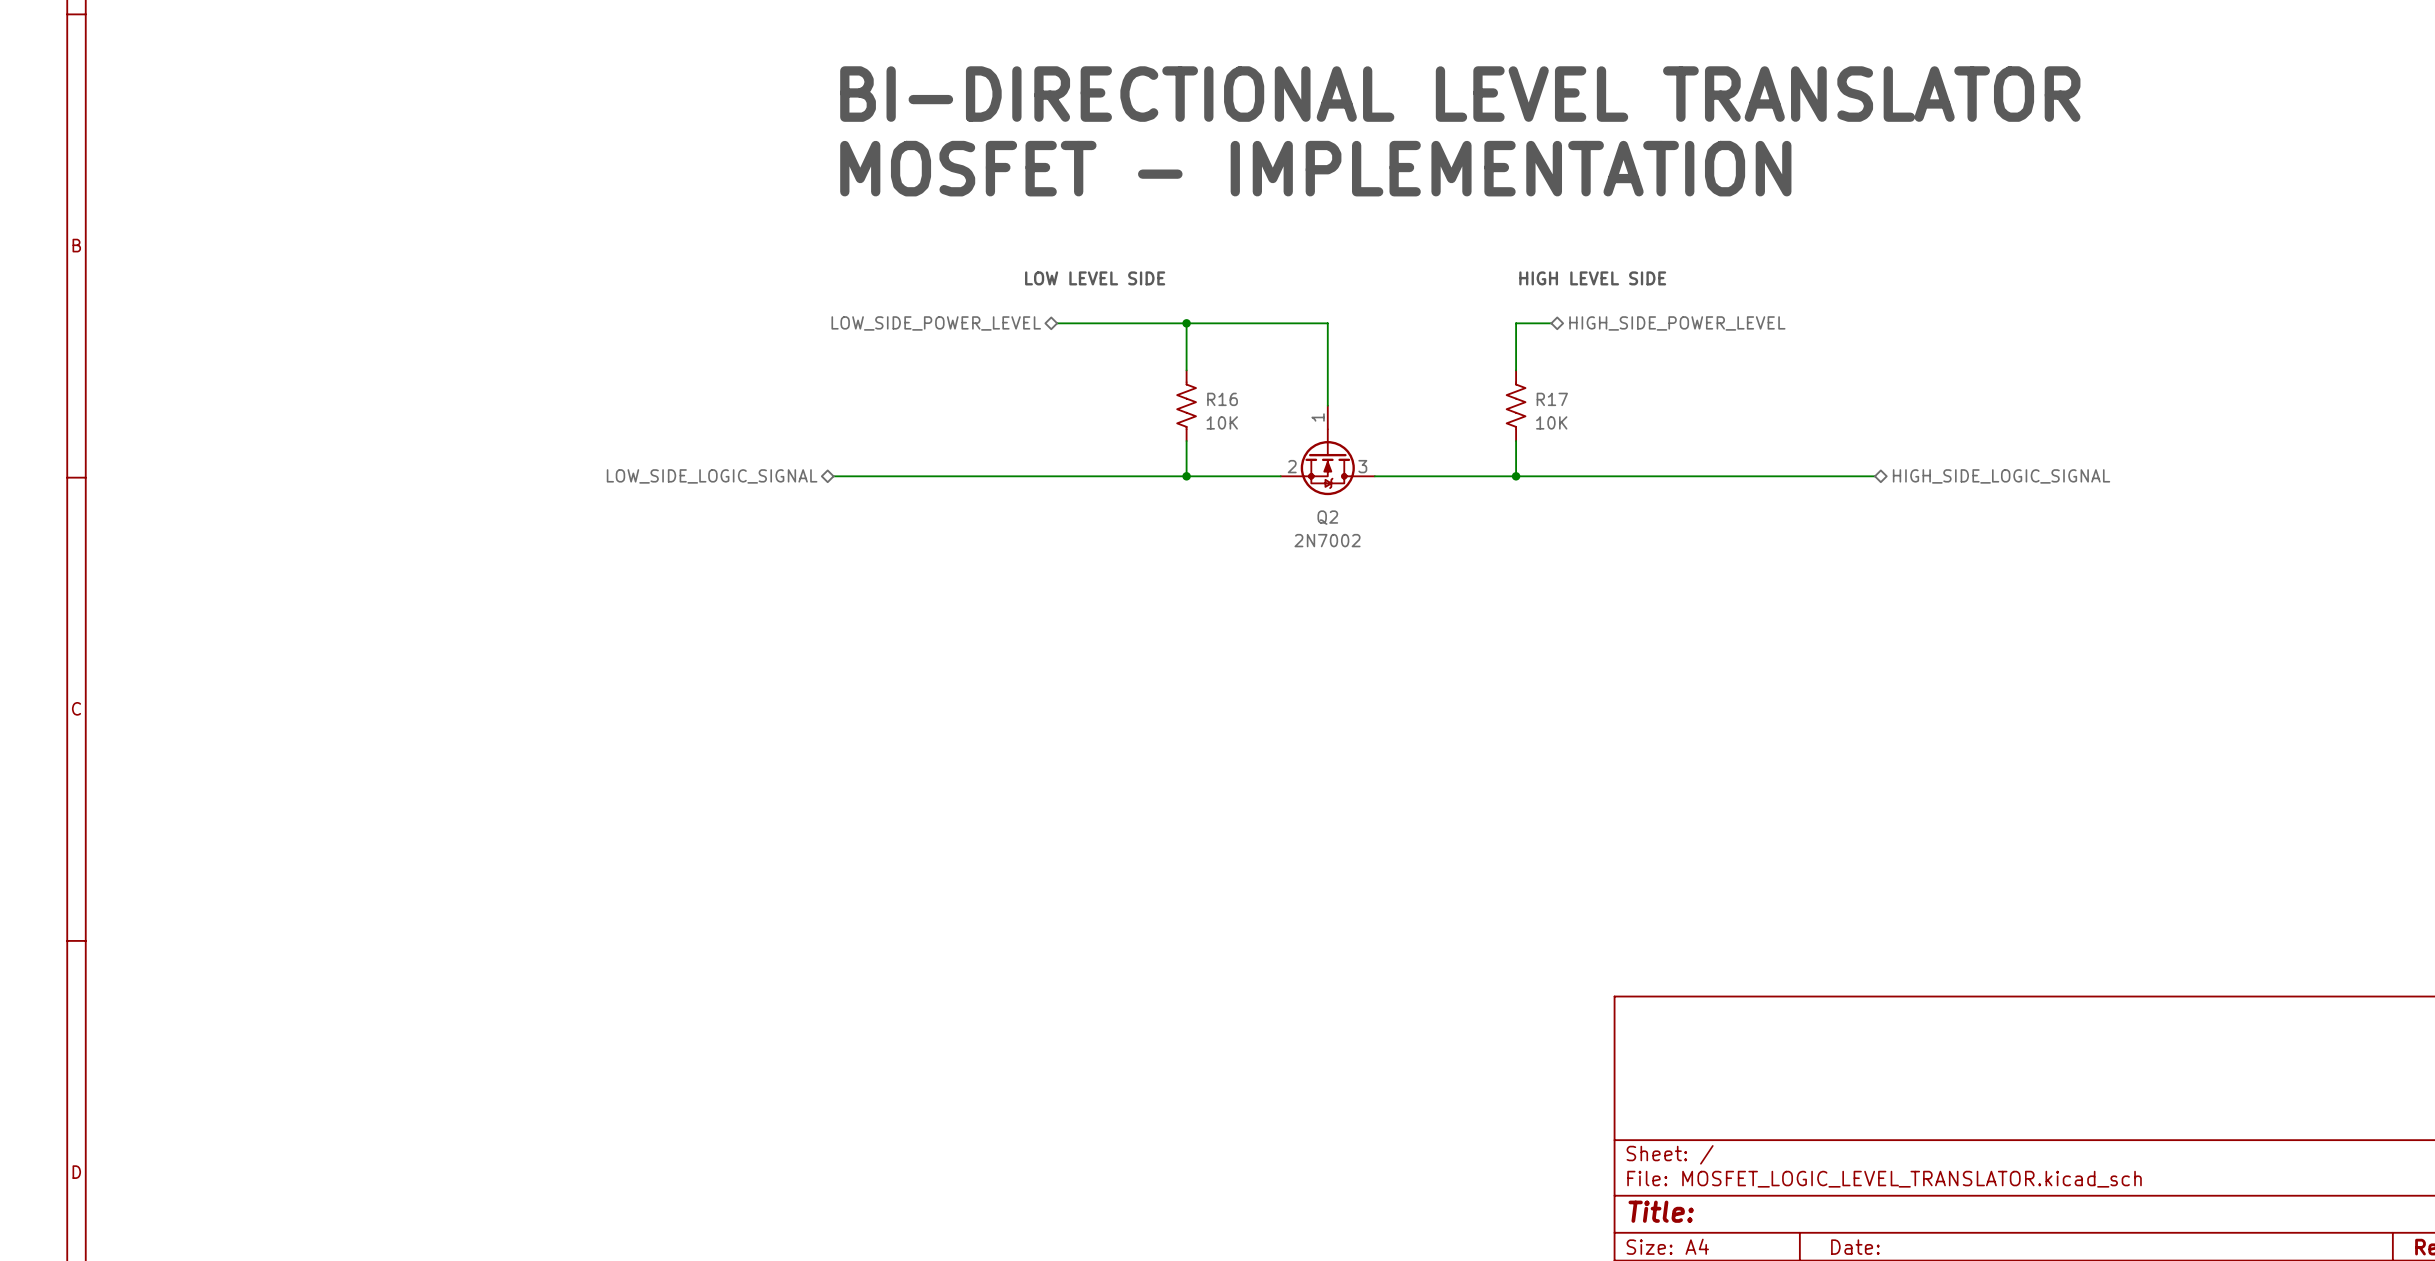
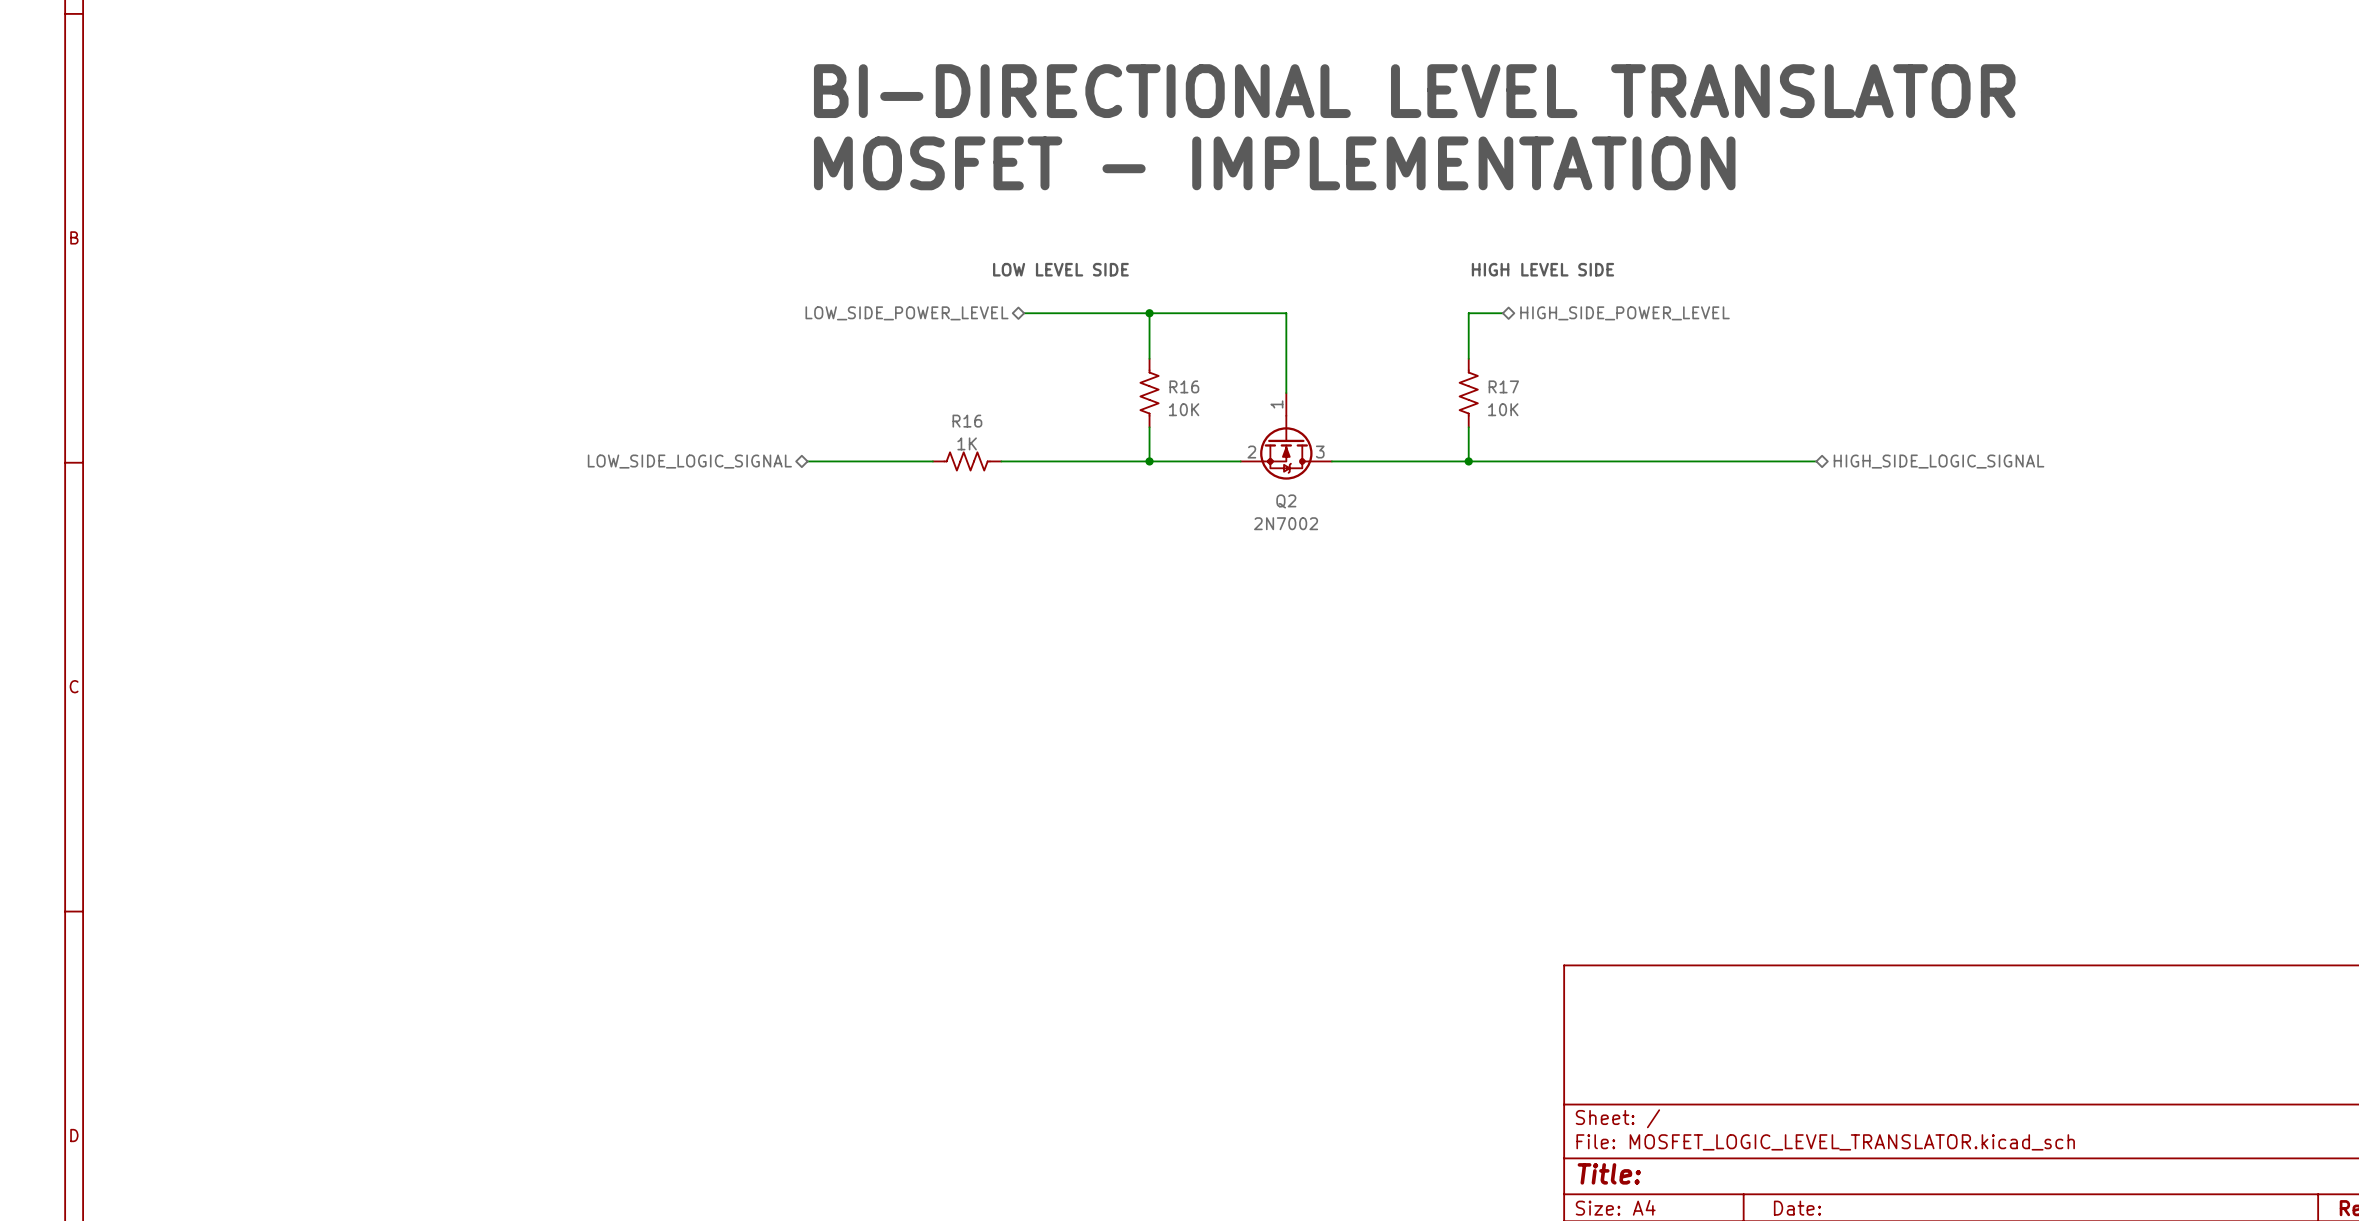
R16: none -> 1K (967, 461)

